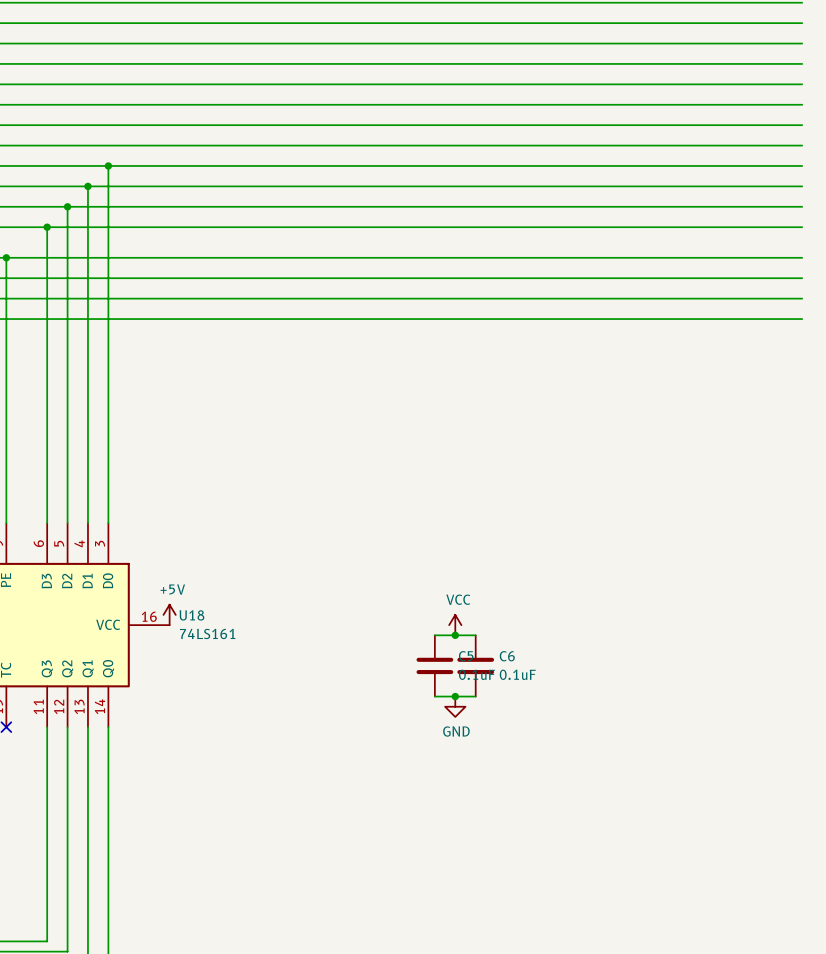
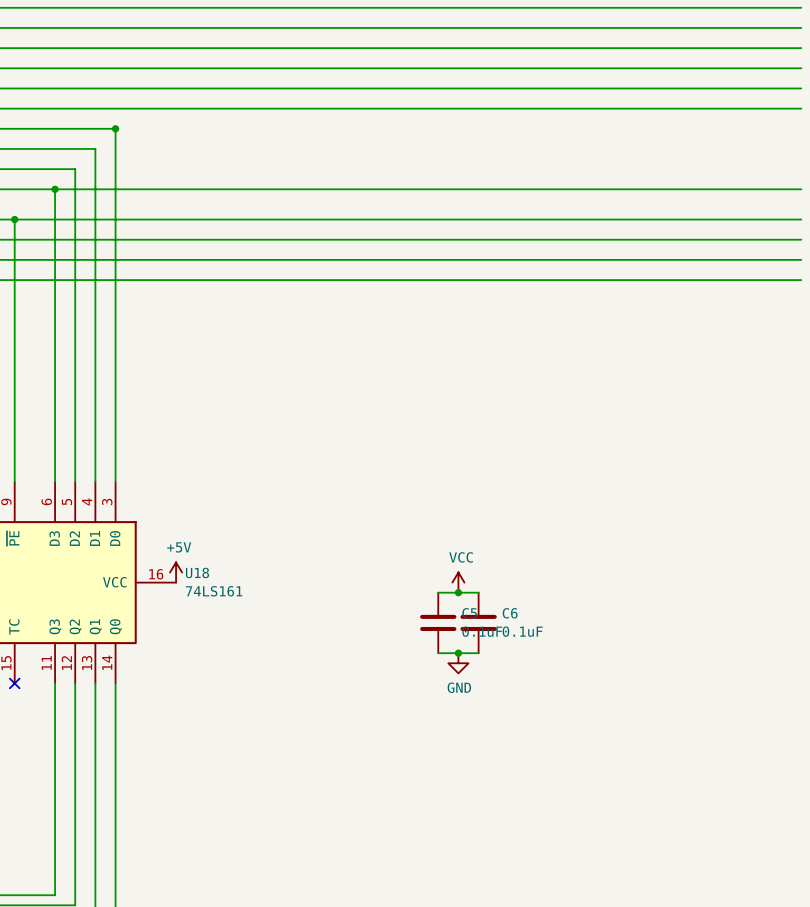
wire: (108, 165) (802, 165) -> none
wire: (87, 186) (802, 186) -> none
junction: (87, 186) -> none
wire: (67, 206) (802, 206) -> none
junction: (67, 206) -> none

